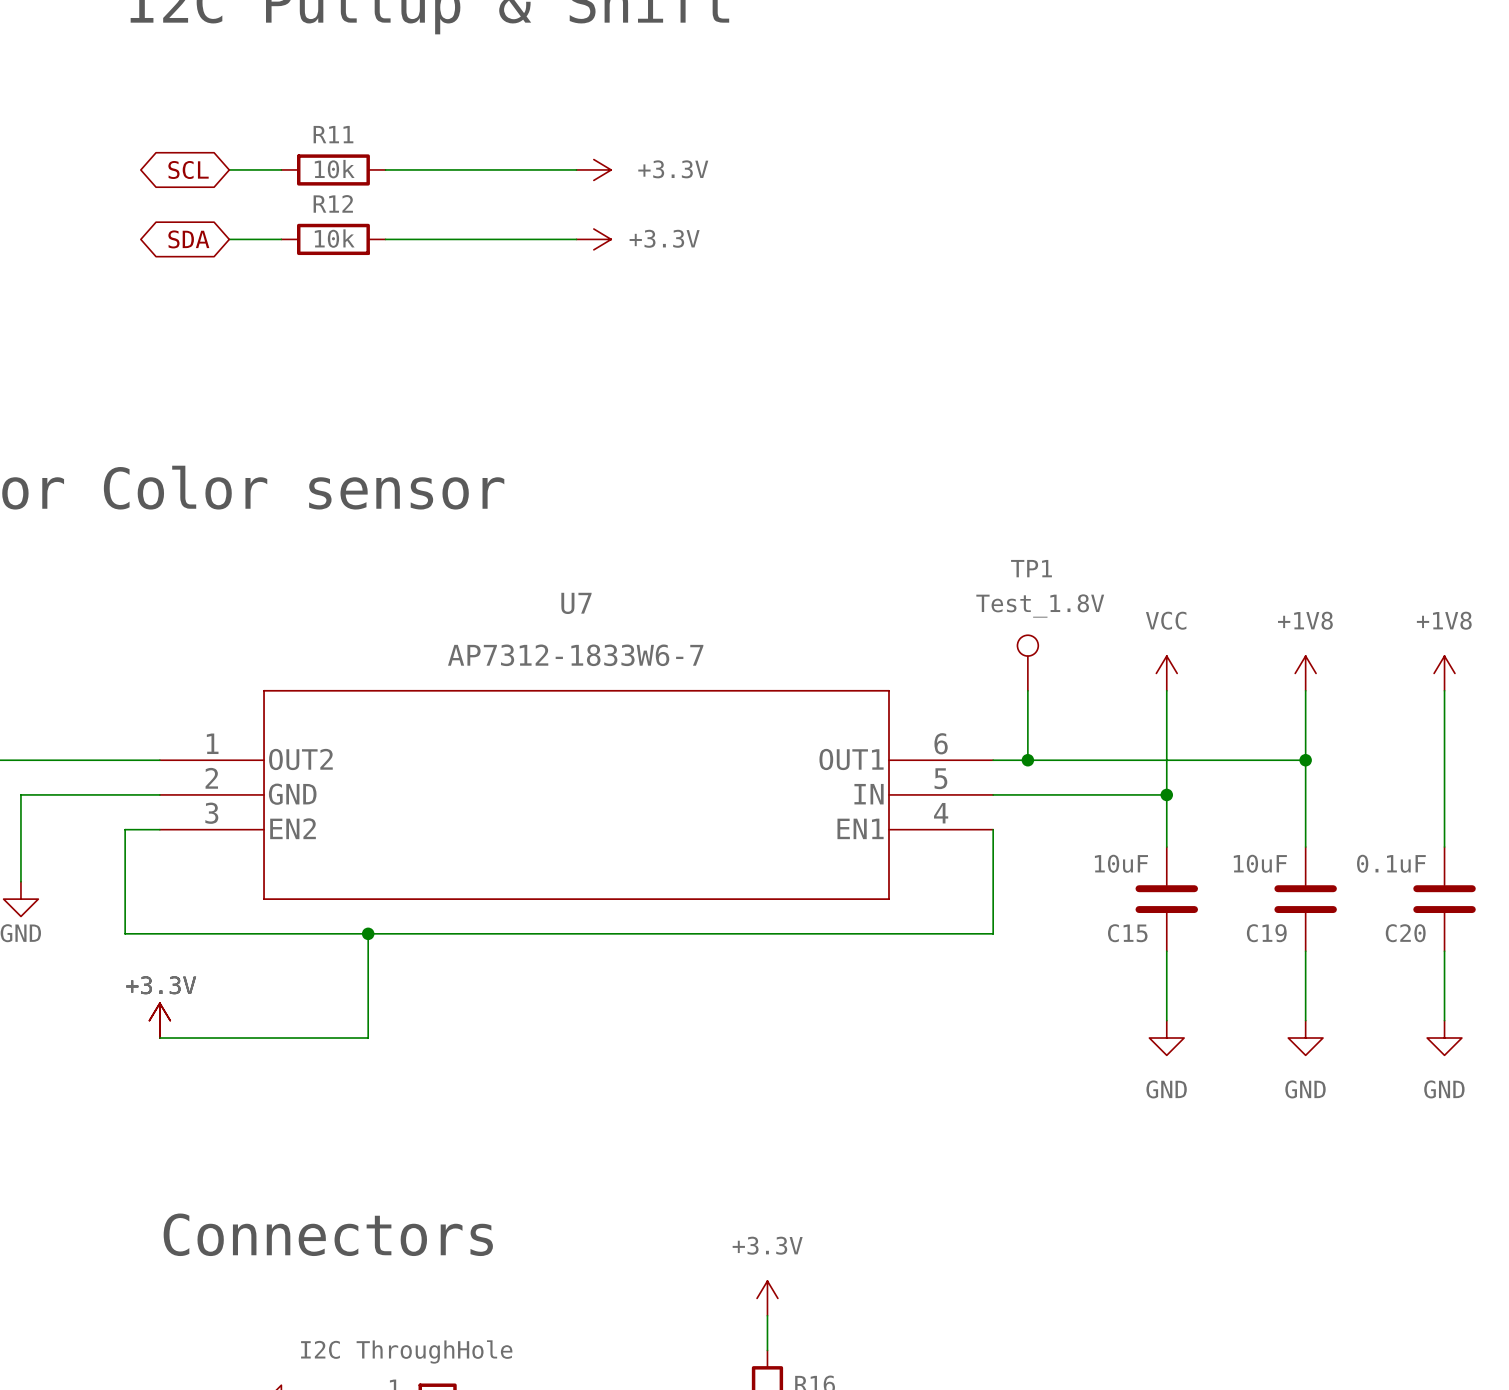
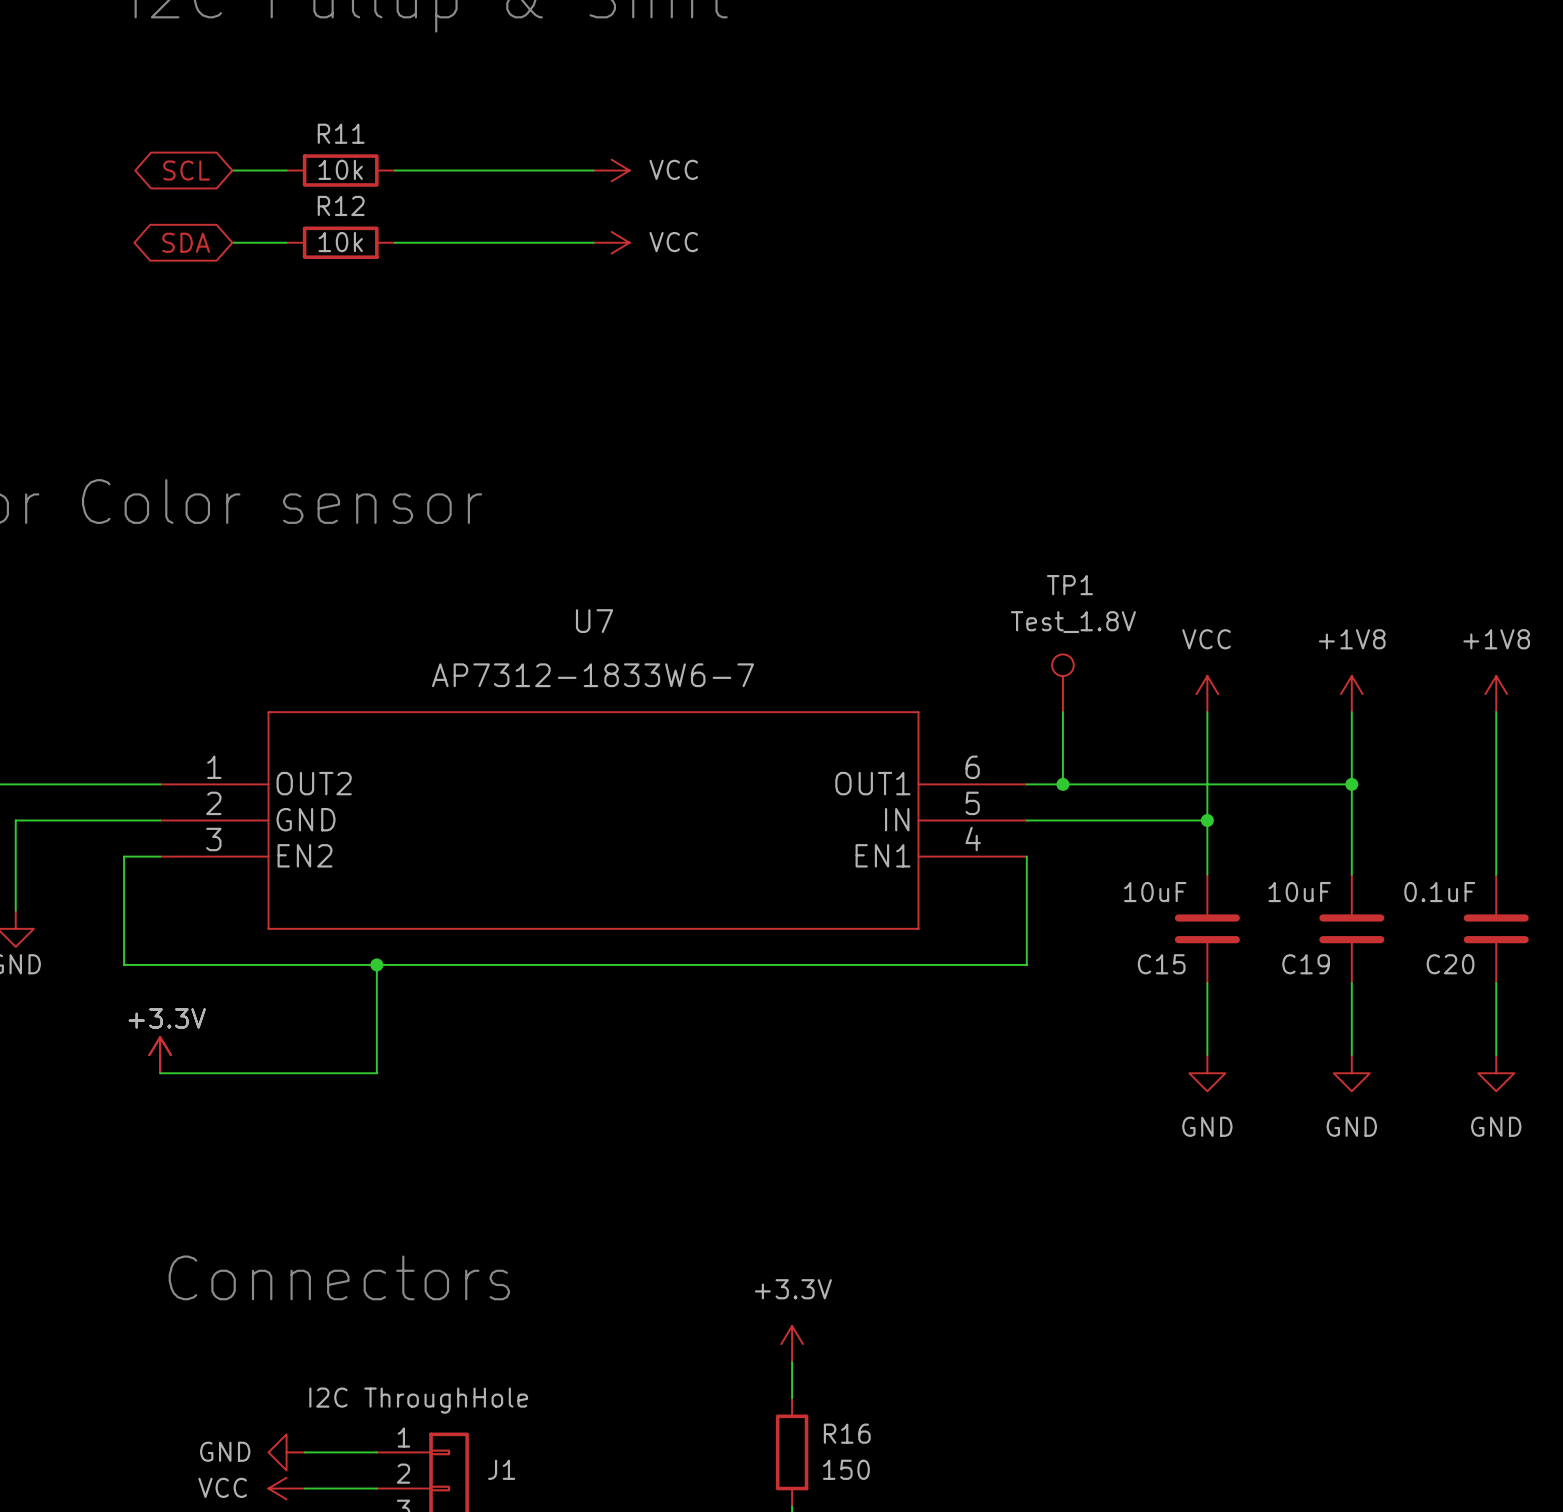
power symbol: +3.3V (593, 169) -> VCC (611, 170)
power symbol: +3.3V (593, 239) -> VCC (611, 242)

